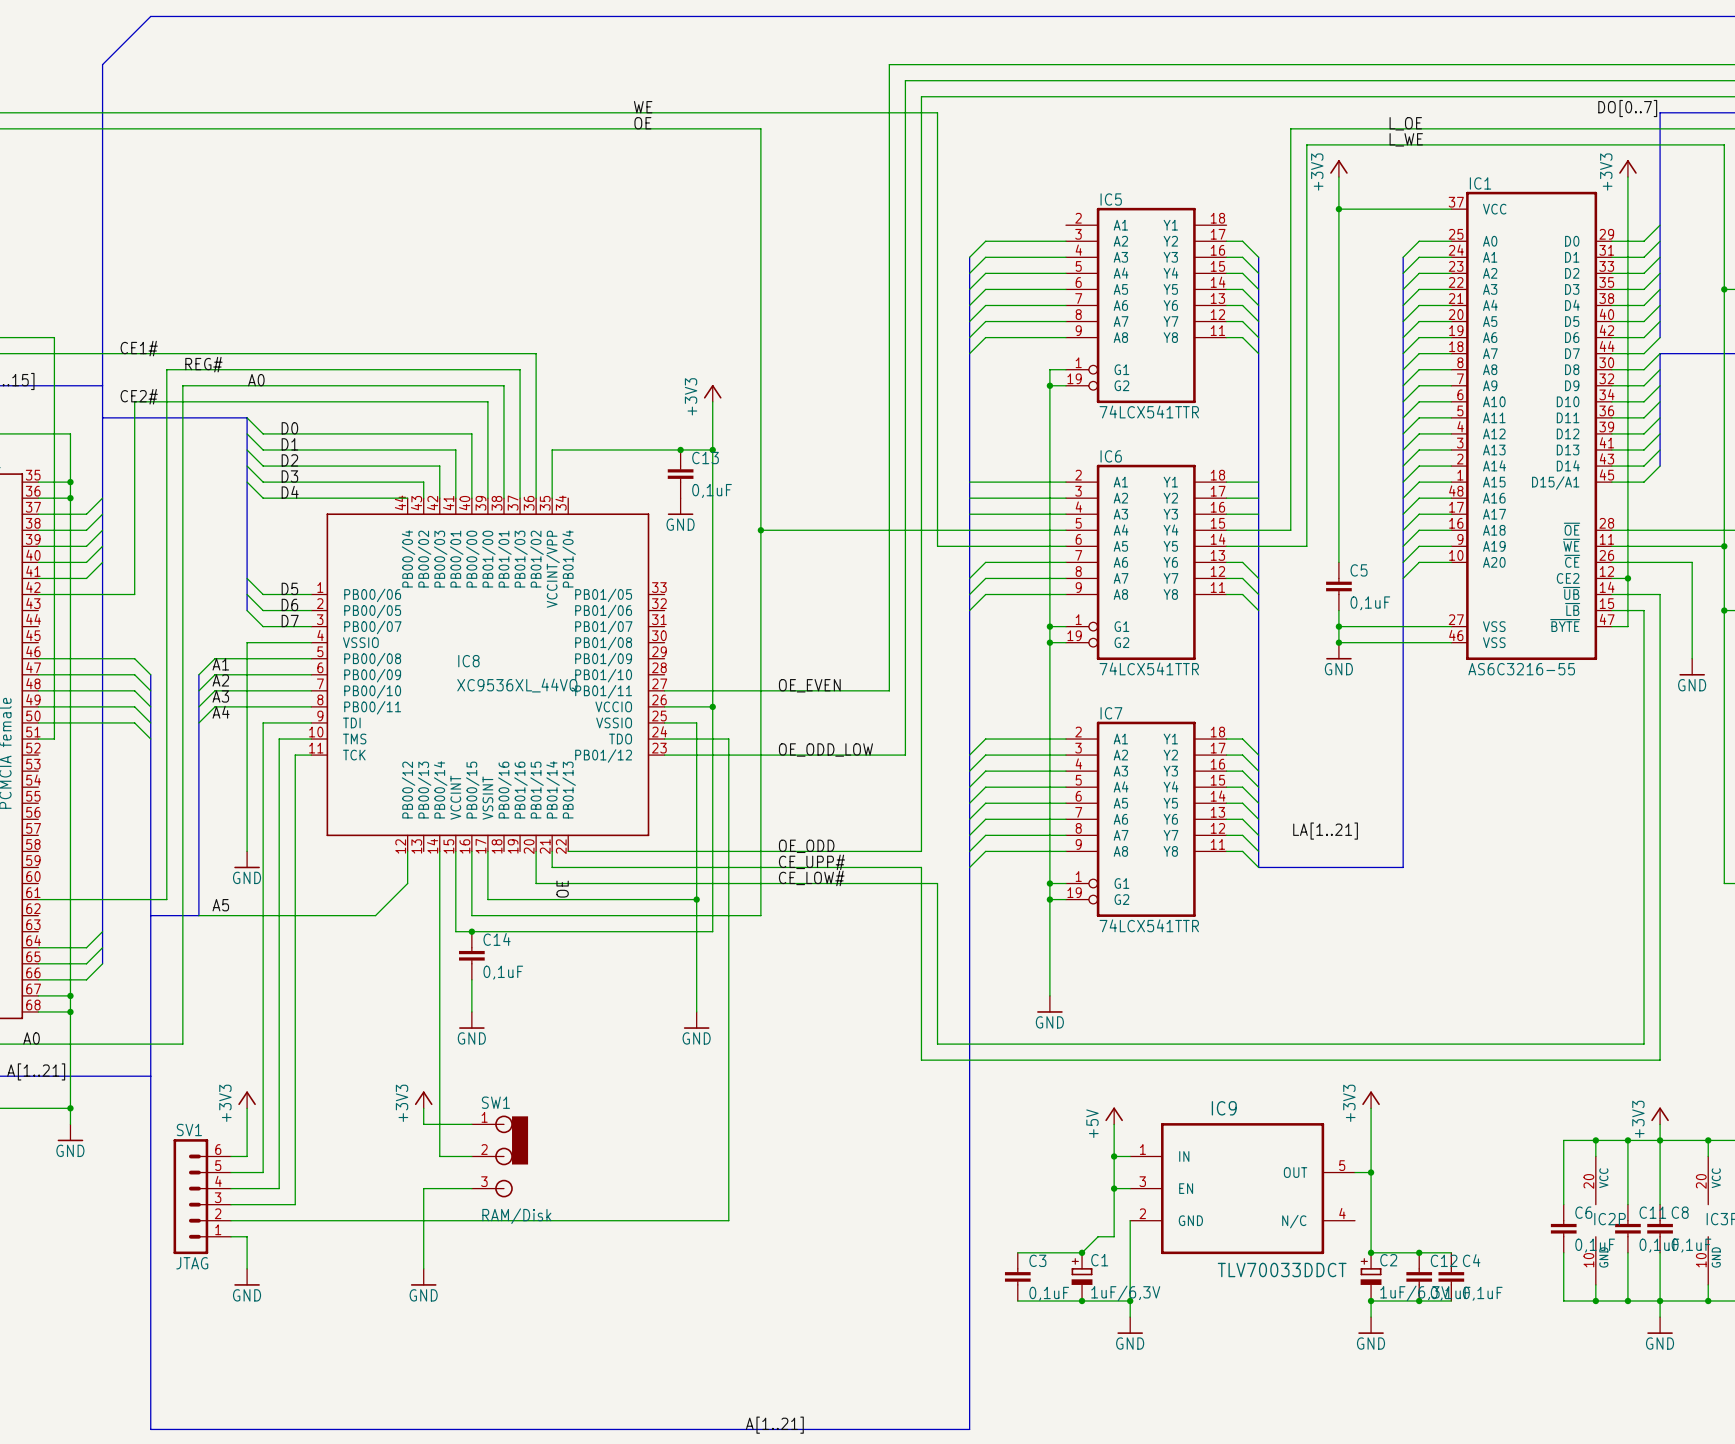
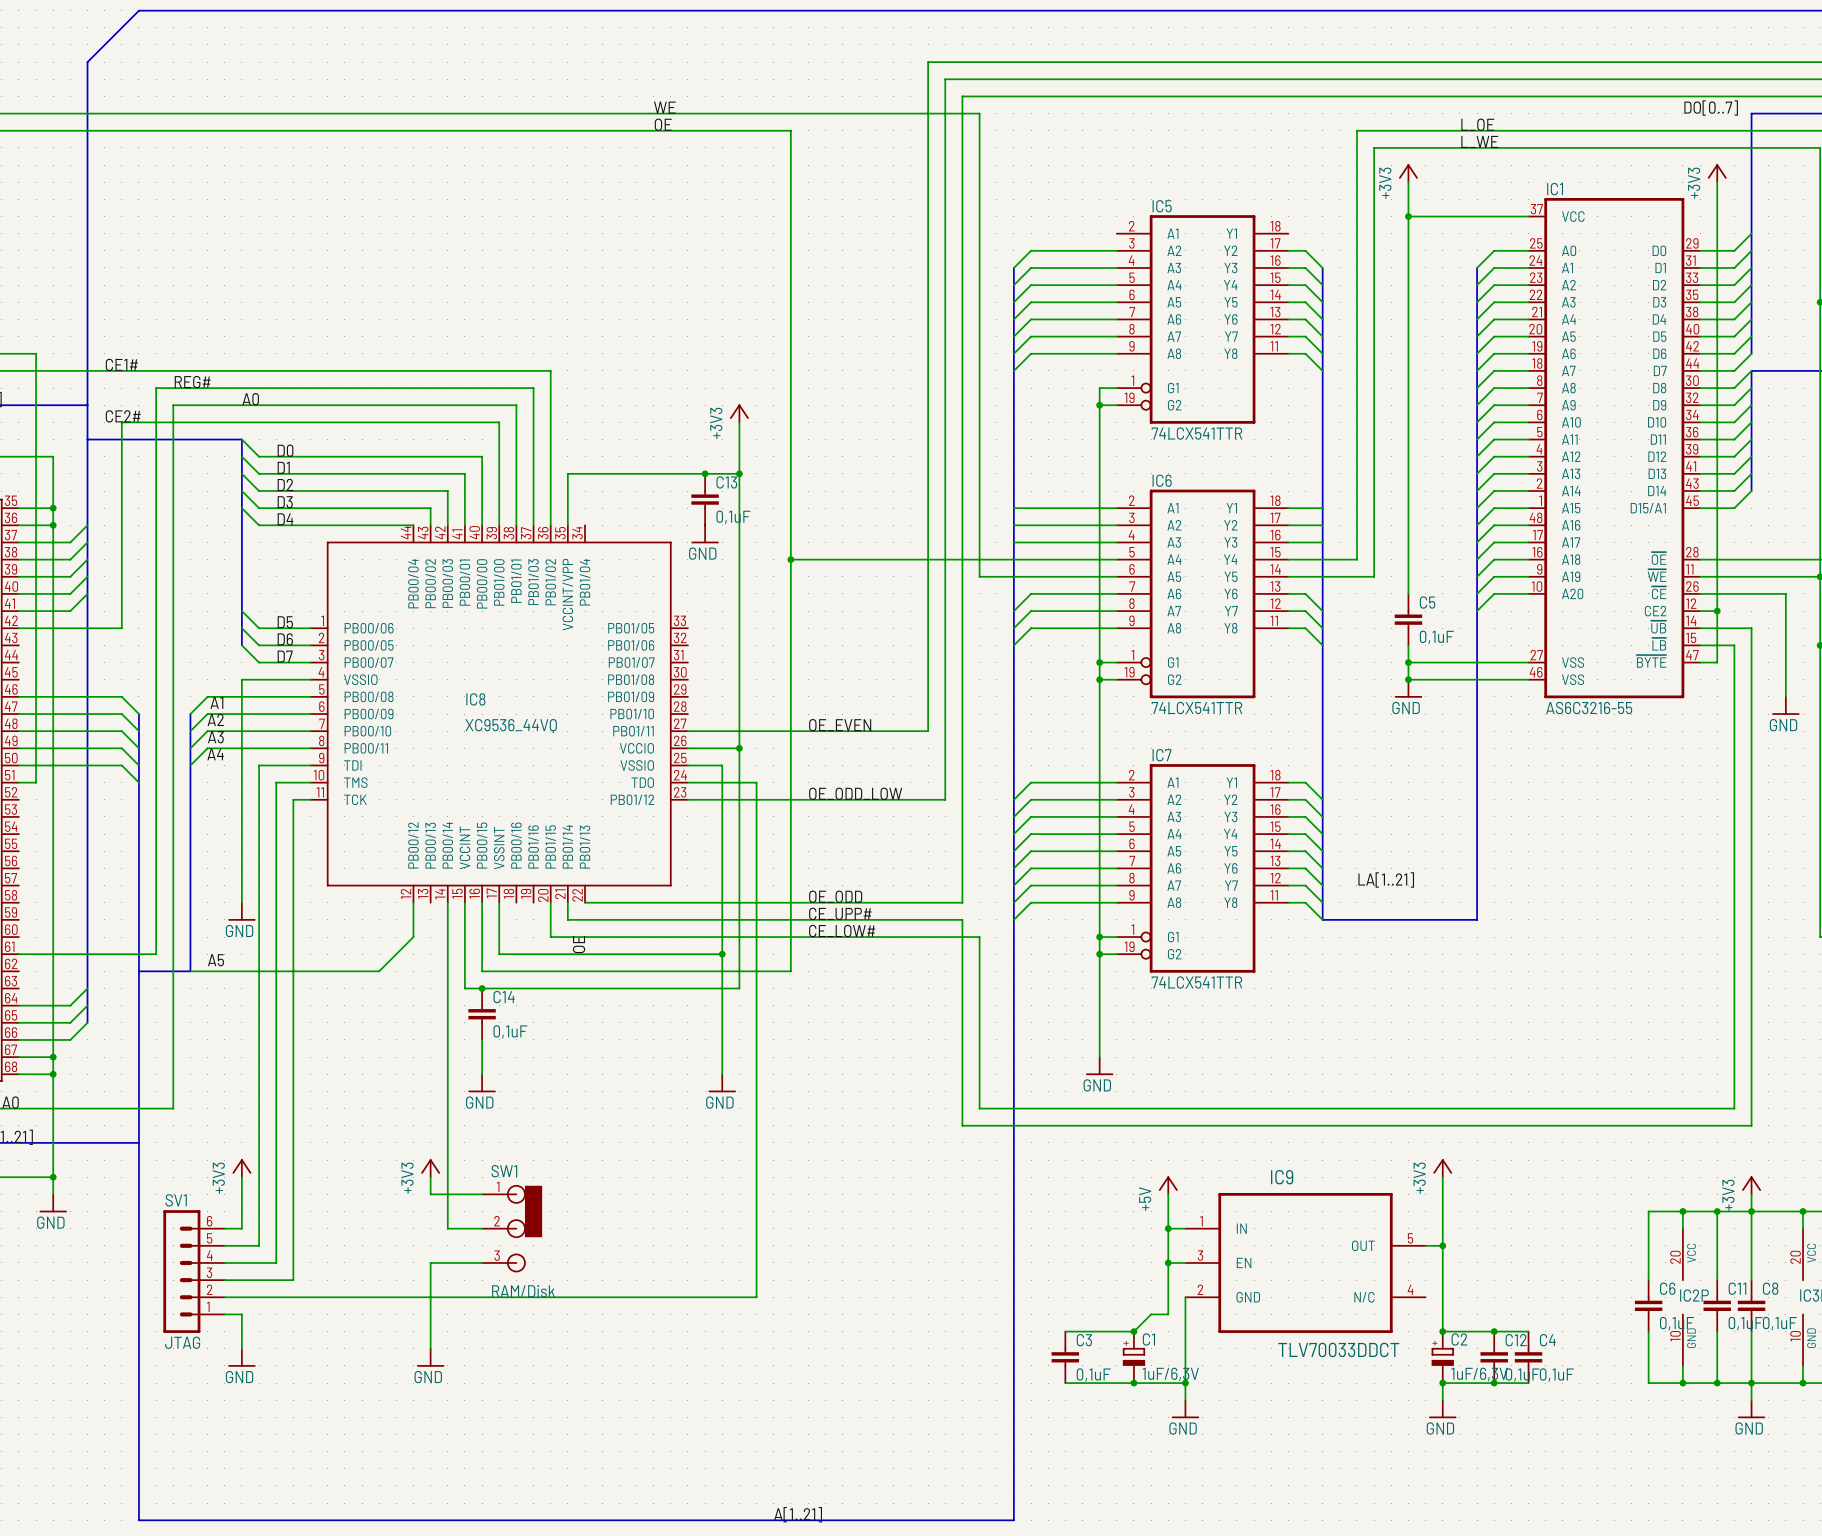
IC8 value: XC9536XL_44VQ (517, 685) -> XC9536_44VQ (511, 726)

